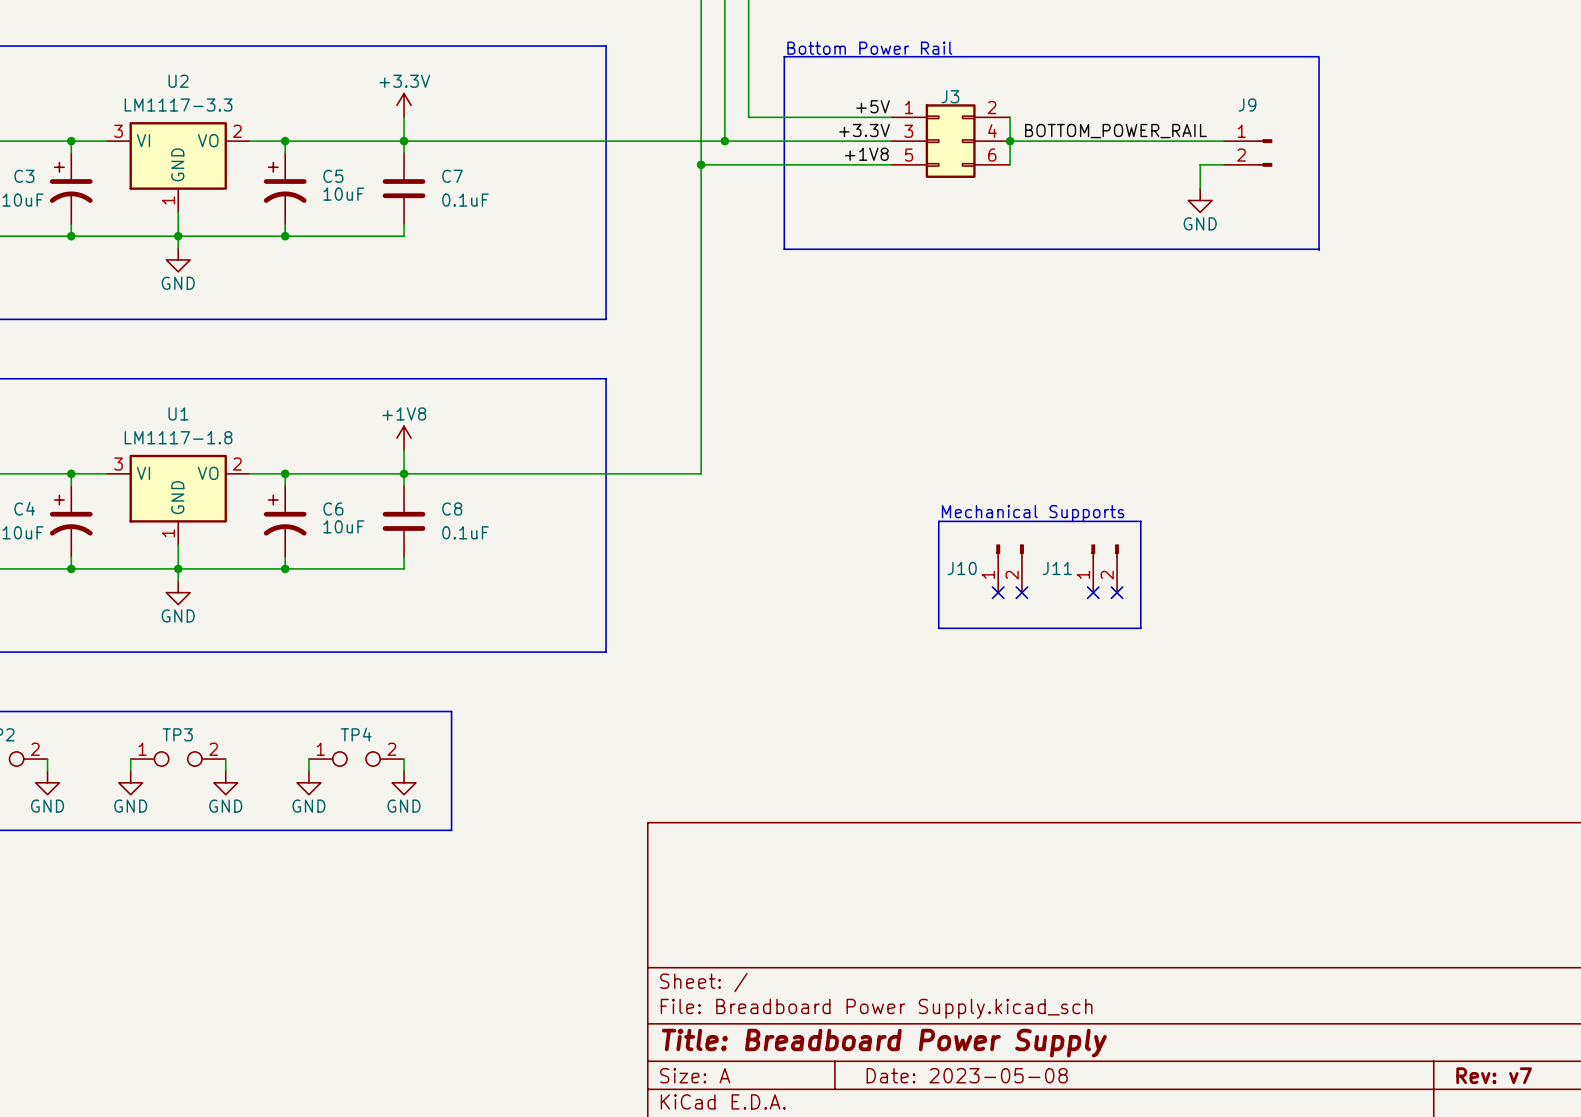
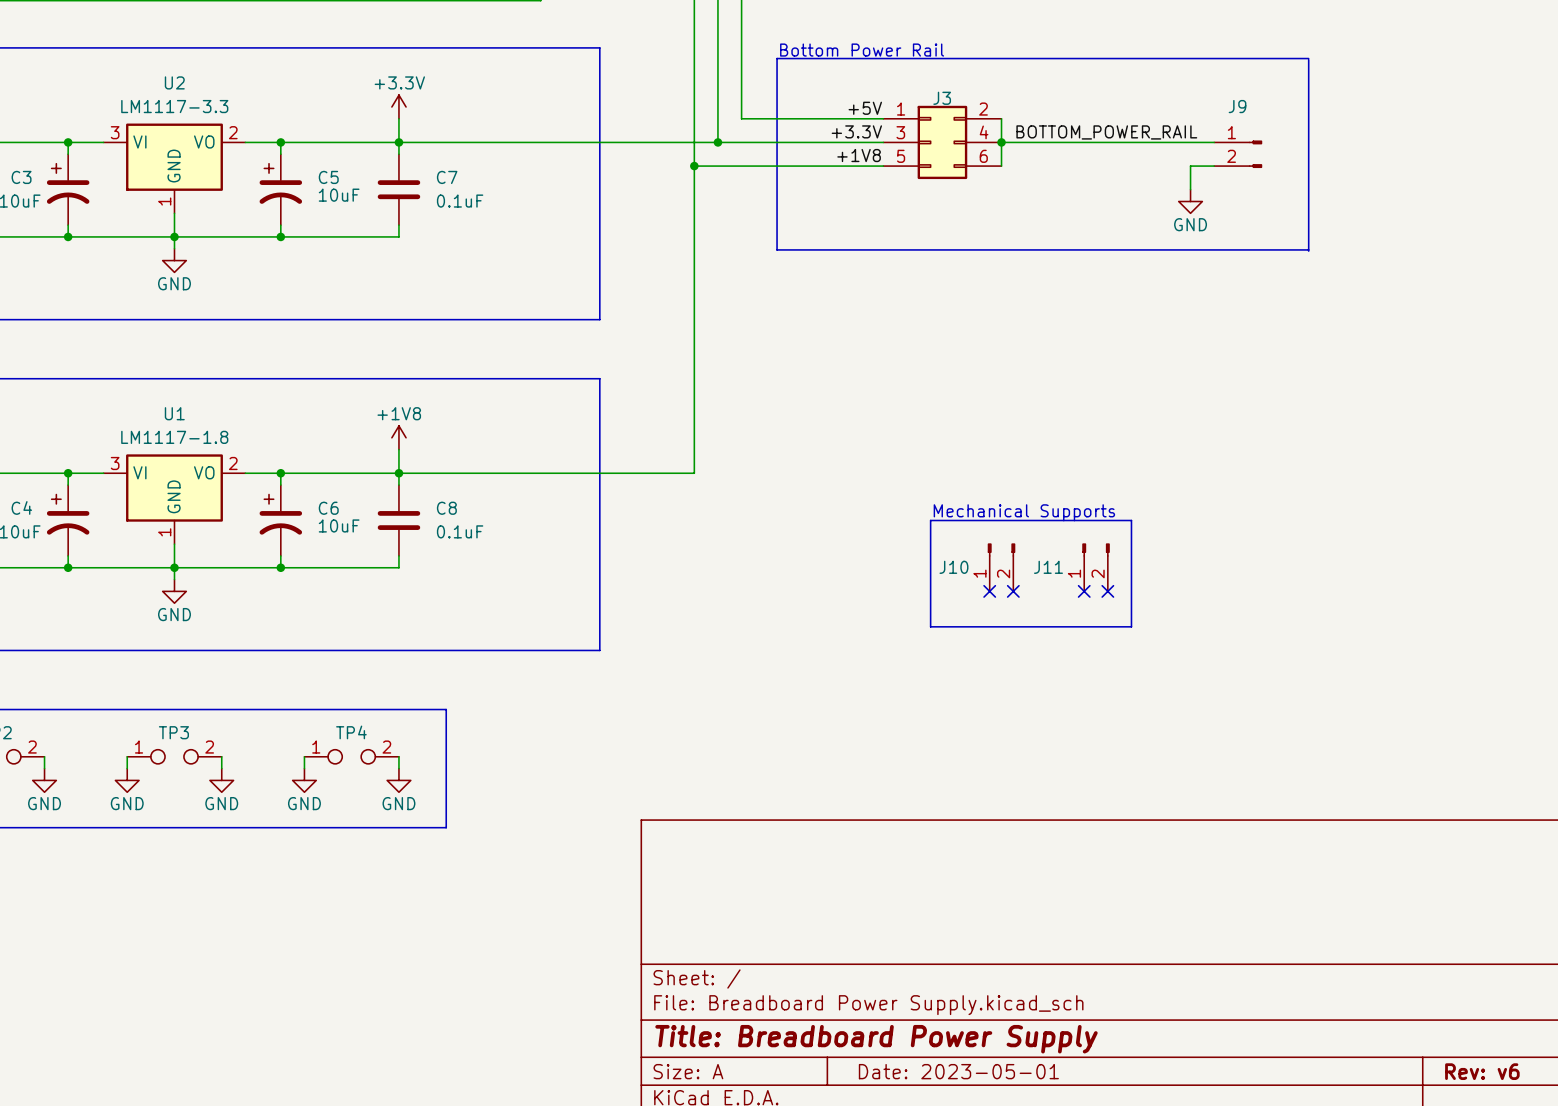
title block: Date: 2023-05-08 (967, 1075) -> Date: 2023-05-01 (958, 1071)
title block: Rev: v7 (1494, 1075) -> Rev: v6 (1482, 1071)

